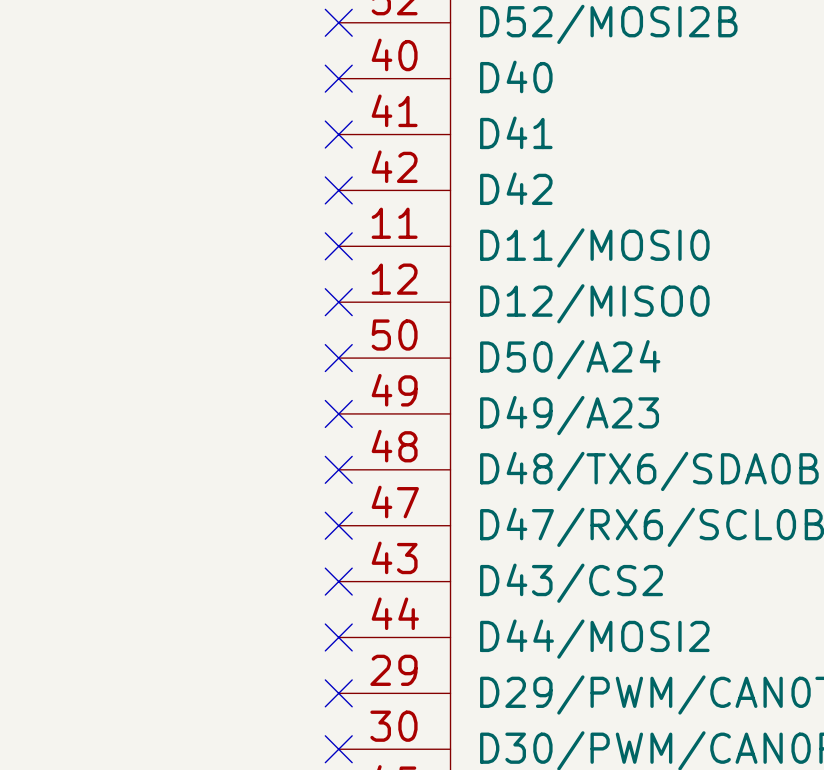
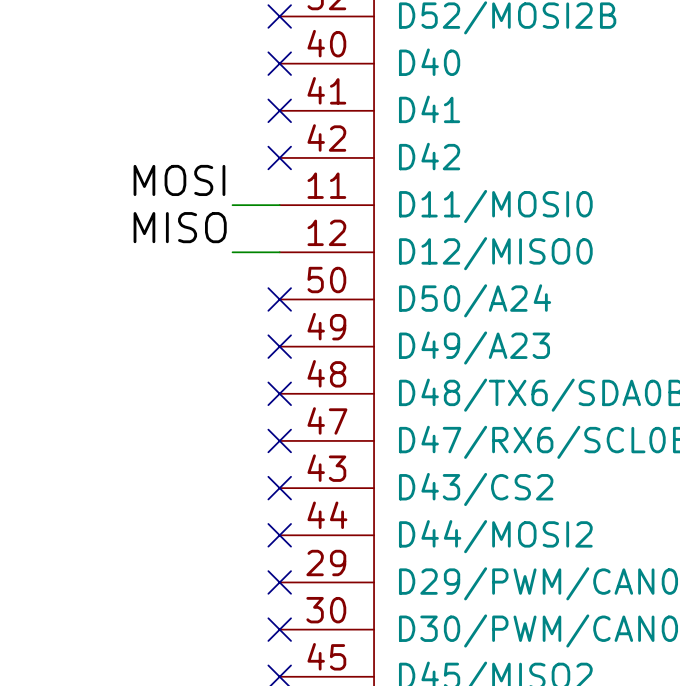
label: none -> MOSI (179, 180)
wire: none -> (232, 205) (279, 205)
no-connect mark: (338, 246) -> none
label: none -> MISO (180, 227)
wire: none -> (232, 252) (279, 252)
no-connect mark: (338, 302) -> none

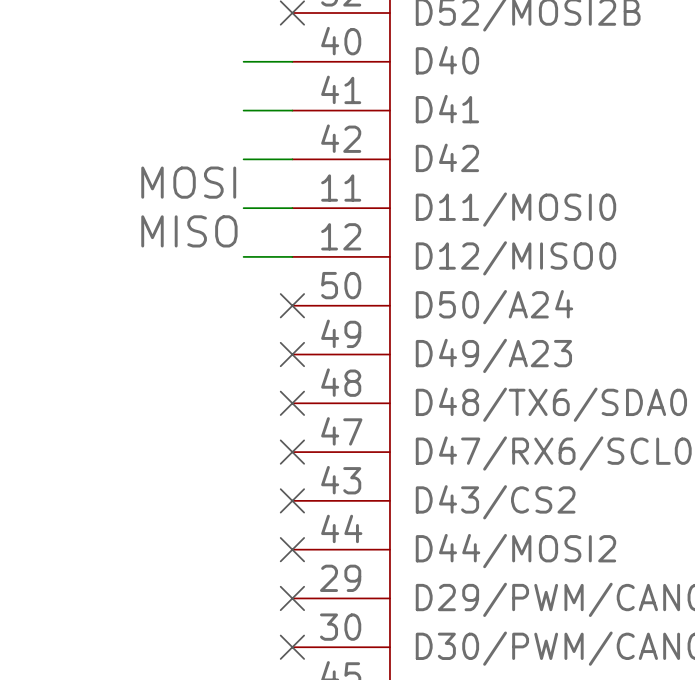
wire: none -> (243, 61) (292, 61)
no-connect mark: (279, 63) -> none
wire: none -> (243, 110) (292, 110)
no-connect mark: (279, 110) -> none
wire: none -> (243, 159) (292, 159)
no-connect mark: (279, 157) -> none

